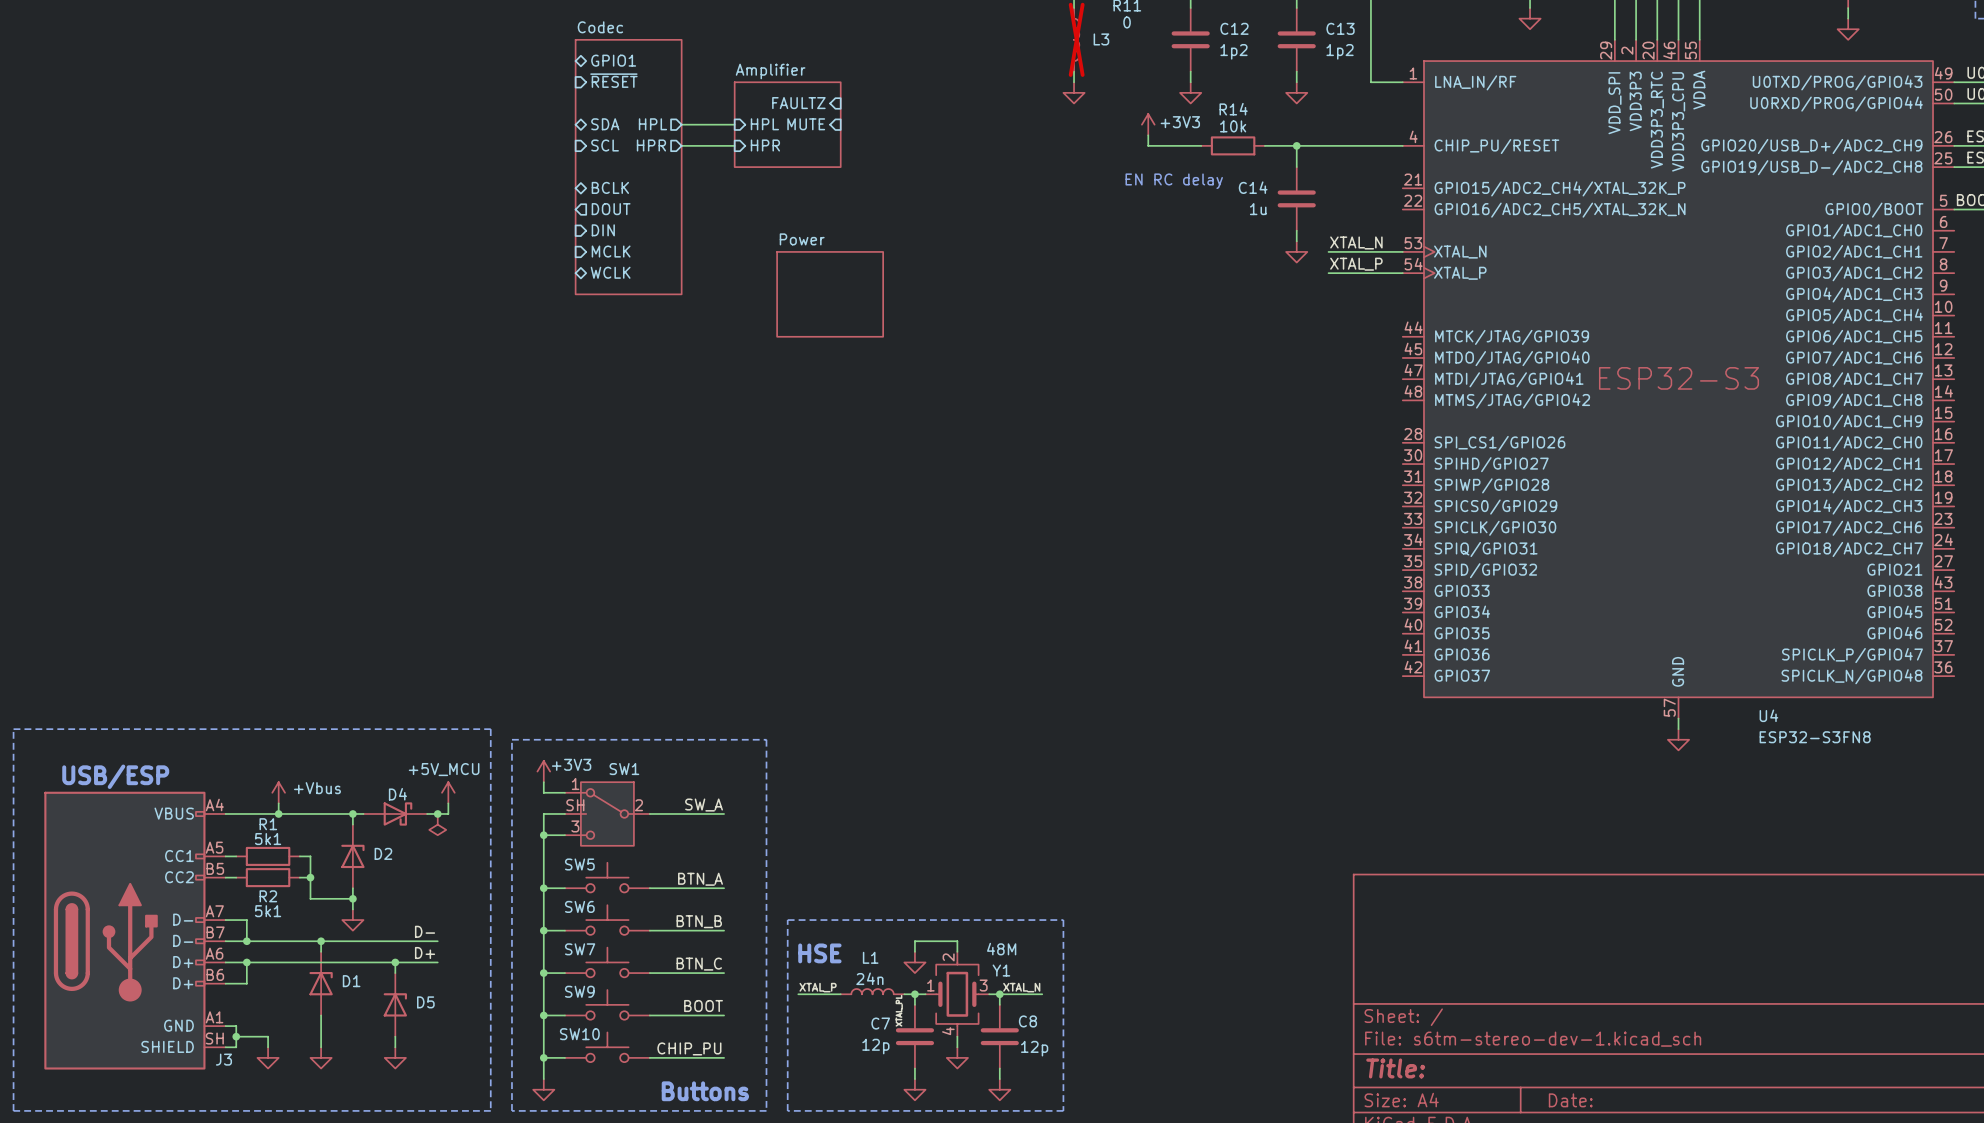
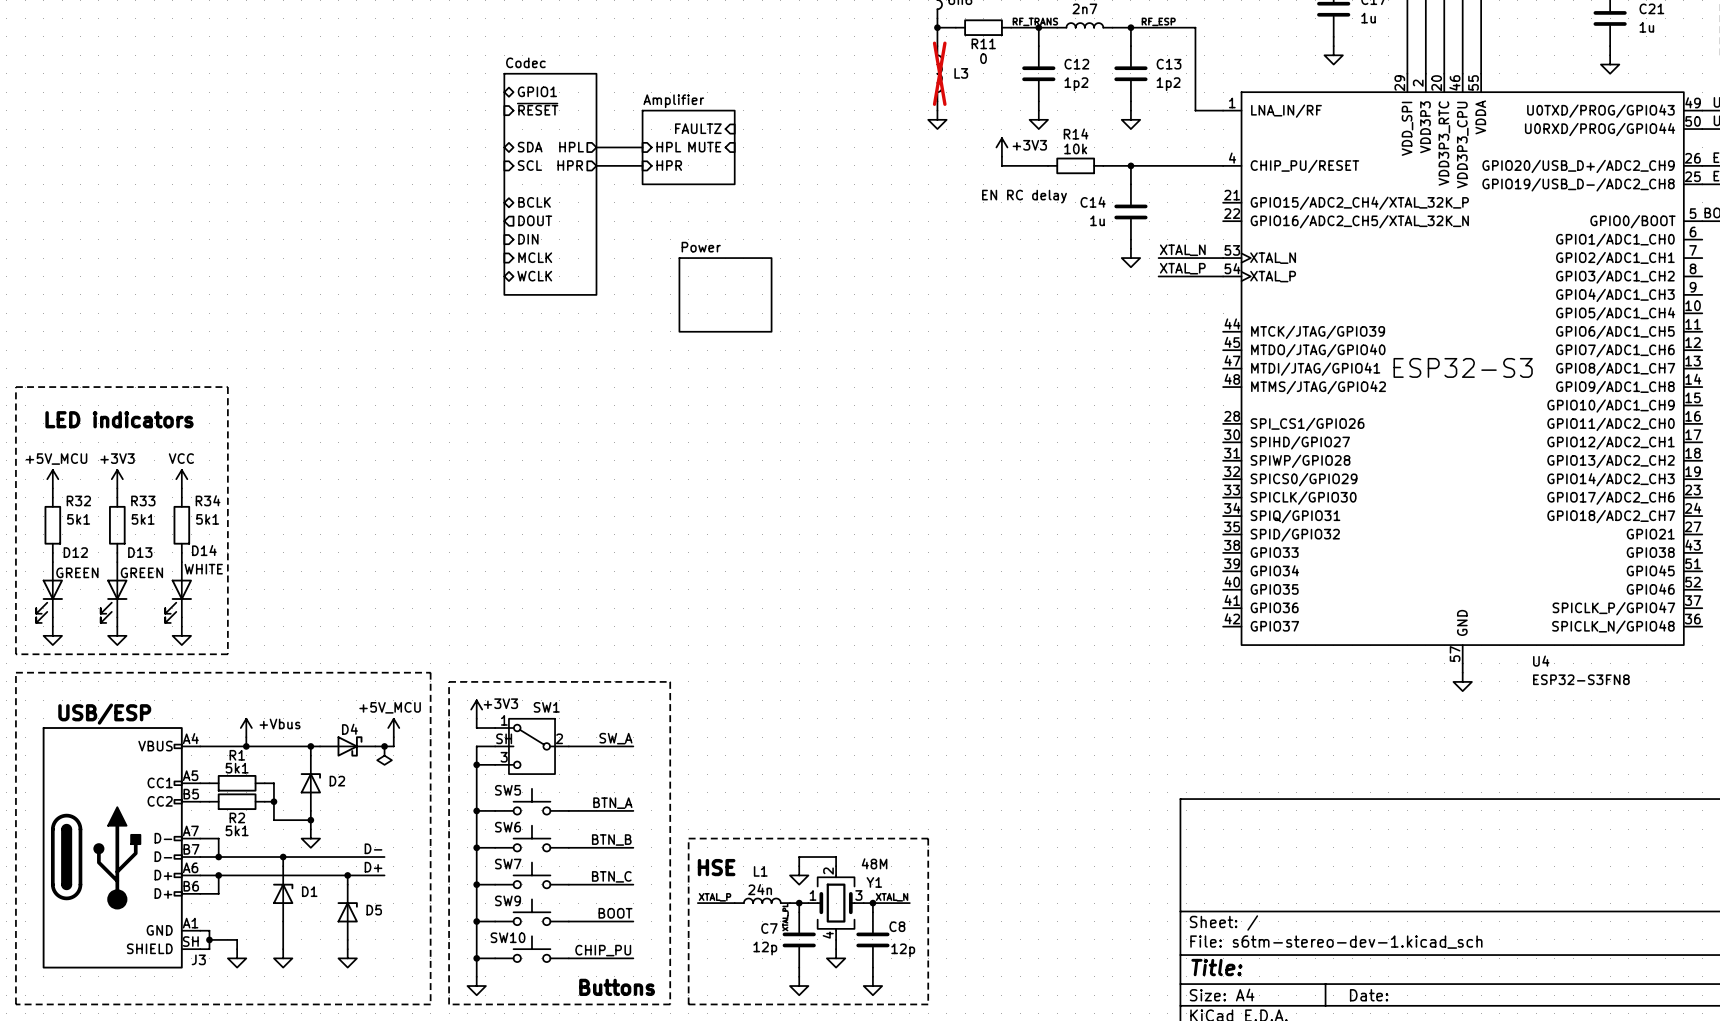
line: none -> (15, 387) (227, 387) (227, 654) (15, 654) (15, 387)
text: none -> LED indicators (119, 419)
power symbol: none -> +5V_MCU (52, 479)
power symbol: none -> +3V3 (117, 479)
power symbol: none -> VCC (181, 479)
wire: none -> (52, 488) (52, 497)
wire: none -> (117, 488) (117, 497)
wire: none -> (181, 488) (181, 497)
R32: none -> 5k1 (52, 525)
R33: none -> 5k1 (117, 525)
R34: none -> 5k1 (181, 525)
wire: none -> (52, 552) (52, 562)
wire: none -> (117, 552) (117, 562)
wire: none -> (181, 552) (181, 562)
D12: none -> GREEN (49, 592)
D13: none -> GREEN (114, 592)
D14: none -> WHITE (178, 592)
wire: none -> (52, 617) (52, 626)
wire: none -> (117, 617) (117, 626)
wire: none -> (181, 617) (181, 626)
power symbol: none -> (52, 635)
power symbol: none -> (117, 635)
power symbol: none -> (181, 635)

